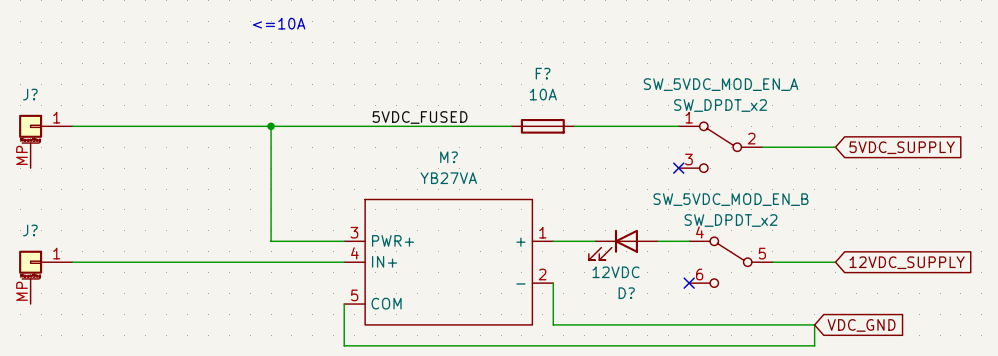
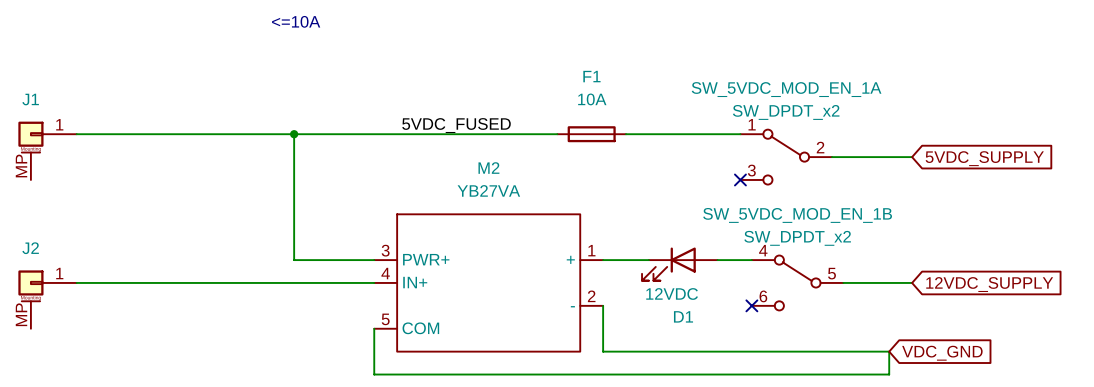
F? name: F? (543, 73) -> F1 (591, 76)
SW_5VDC_MOD_EN_A name: SW_5VDC_MOD_EN_A (721, 84) -> SW_5VDC_MOD_EN_1A (786, 89)
J? name: J? (30, 94) -> J1 (30, 99)
M? name: M? (449, 157) -> M2 (488, 168)
SW_5VDC_MOD_EN_B name: SW_5VDC_MOD_EN_B (731, 199) -> SW_5VDC_MOD_EN_1B (797, 215)
J? name: J? (30, 230) -> J2 (30, 248)
D? name: D? (626, 293) -> D1 (683, 316)

